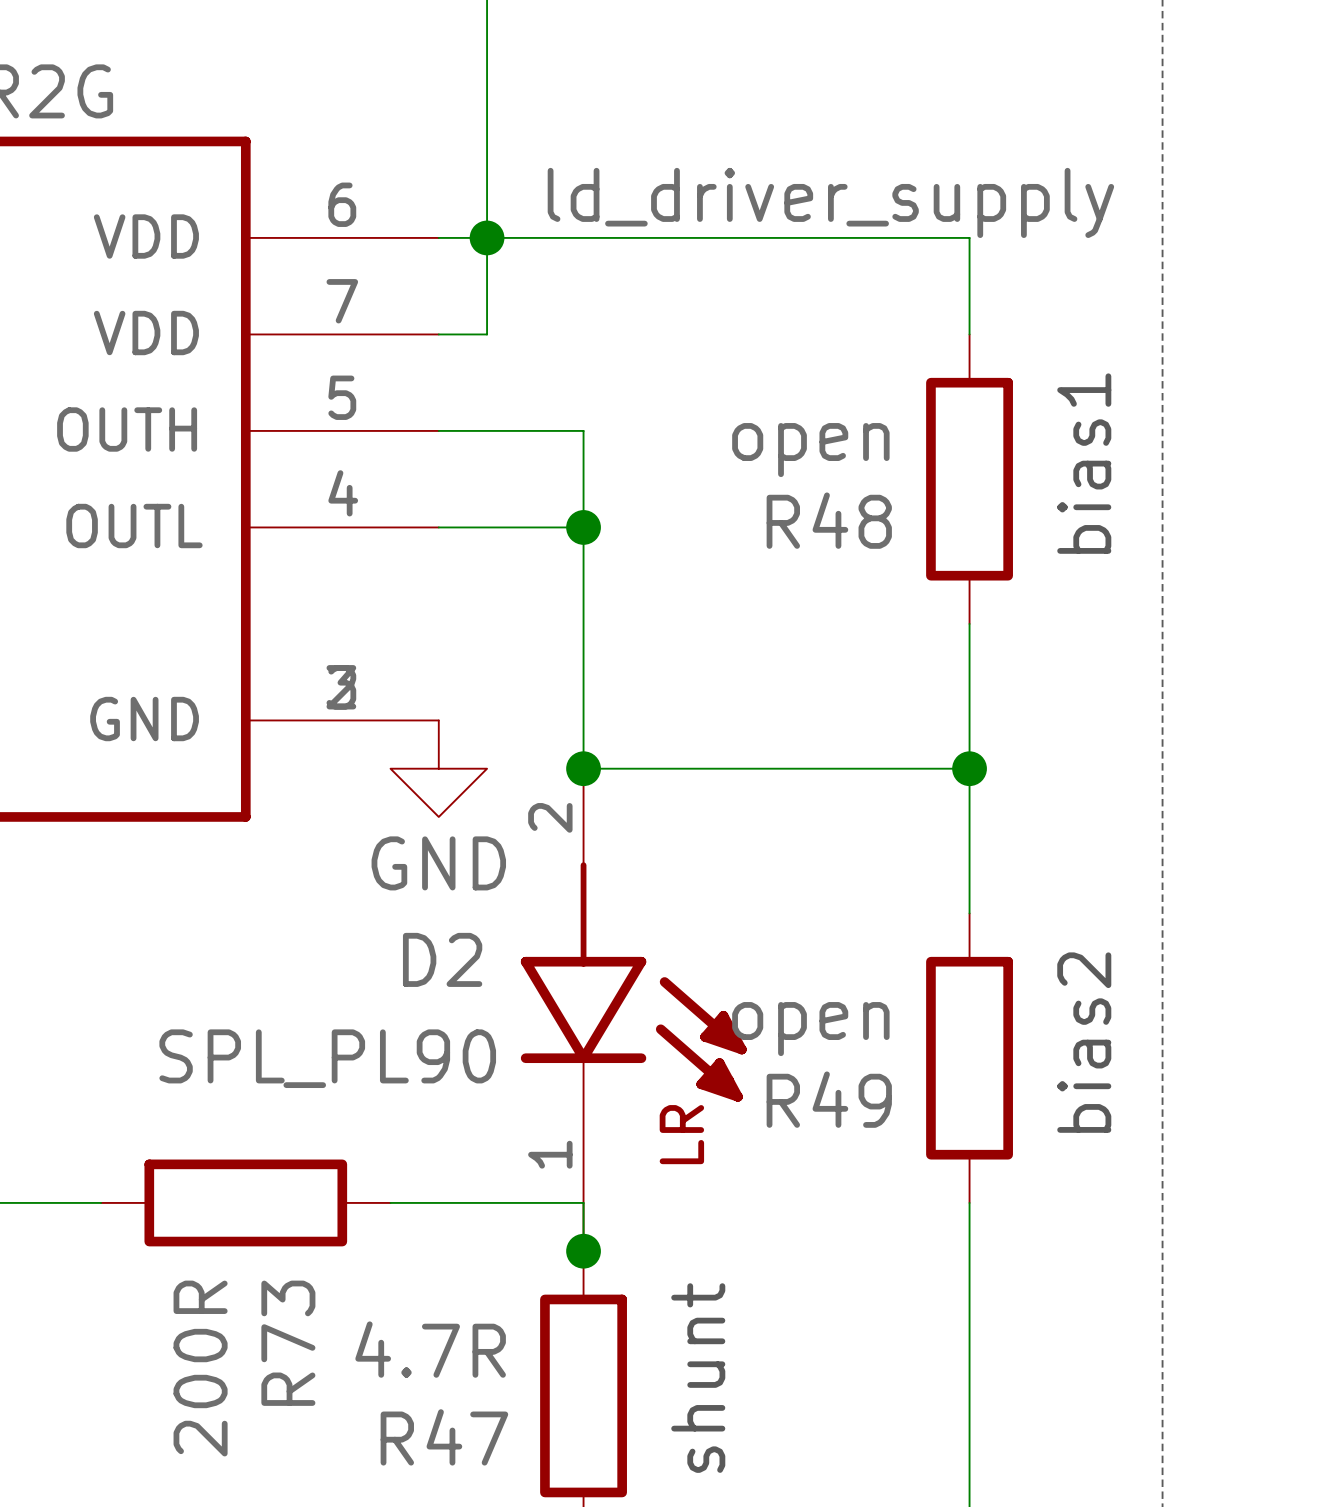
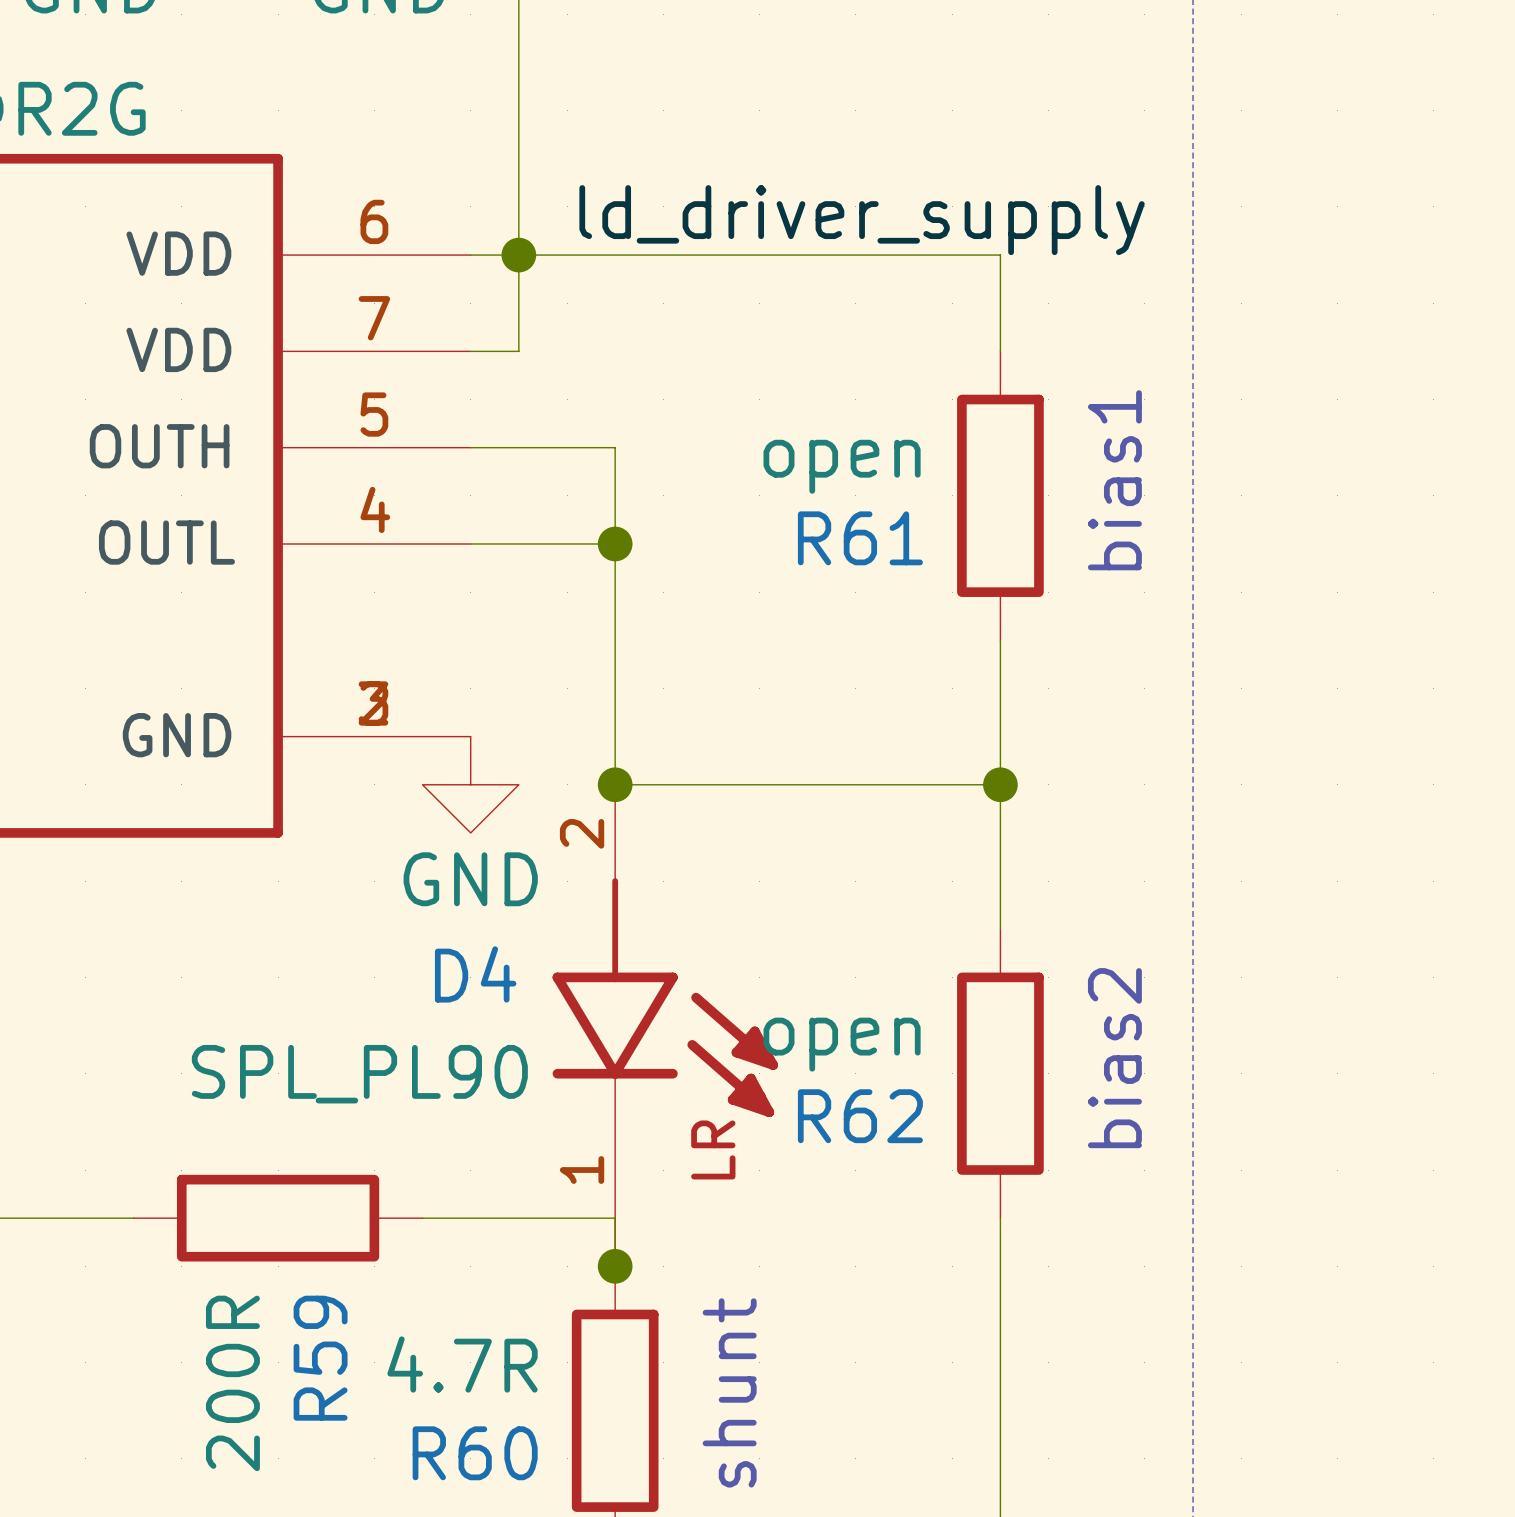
R48 name: R48 (829, 520) -> R61 (860, 538)
D2 name: D2 (442, 959) -> D4 (475, 974)
R49 name: R49 (829, 1099) -> R62 (860, 1116)
R73 name: R73 (288, 1343) -> R59 (320, 1358)
R47 name: R47 (444, 1437) -> R60 (475, 1453)

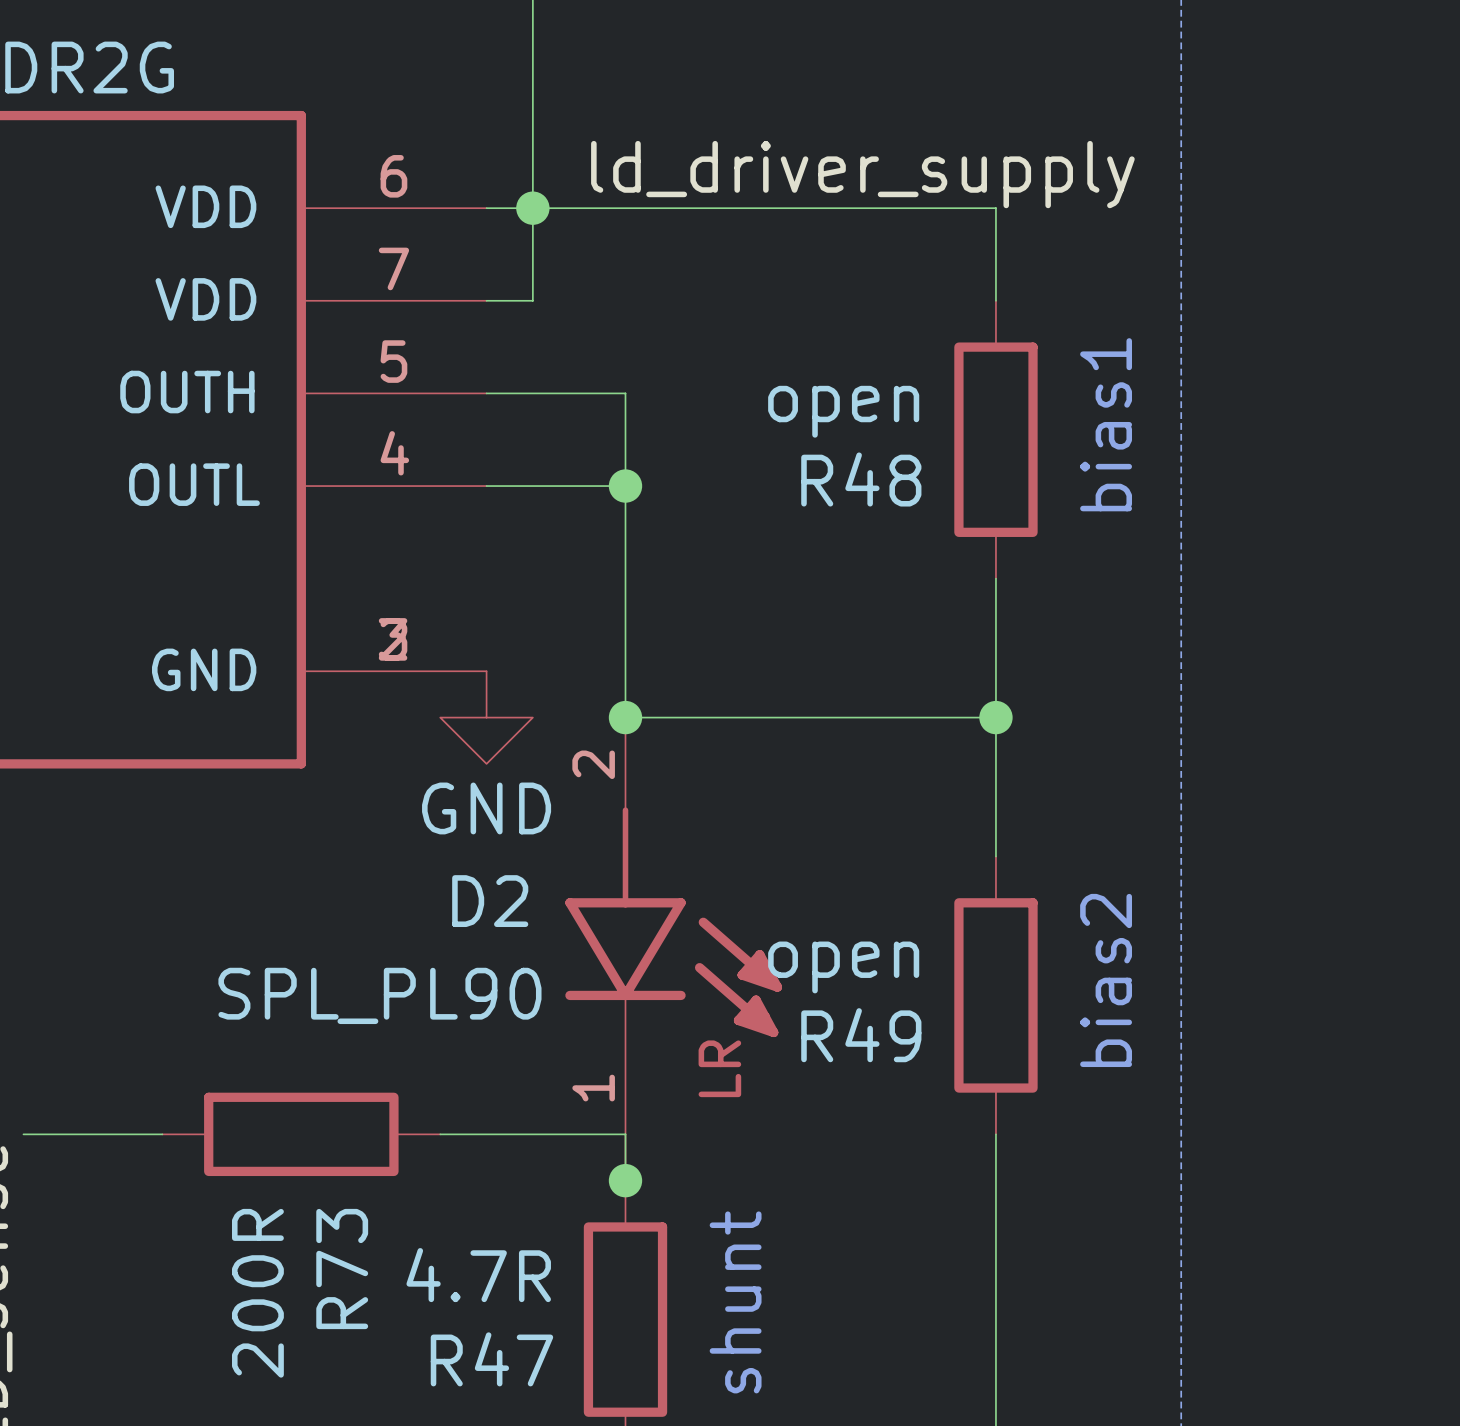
R61 name: R61 (860, 538) -> R48 (861, 479)
D4 name: D4 (475, 974) -> D2 (490, 901)
R62 name: R62 (860, 1116) -> R49 (861, 1035)
R59 name: R59 (320, 1358) -> R73 (342, 1269)
R60 name: R60 (475, 1453) -> R47 (491, 1359)

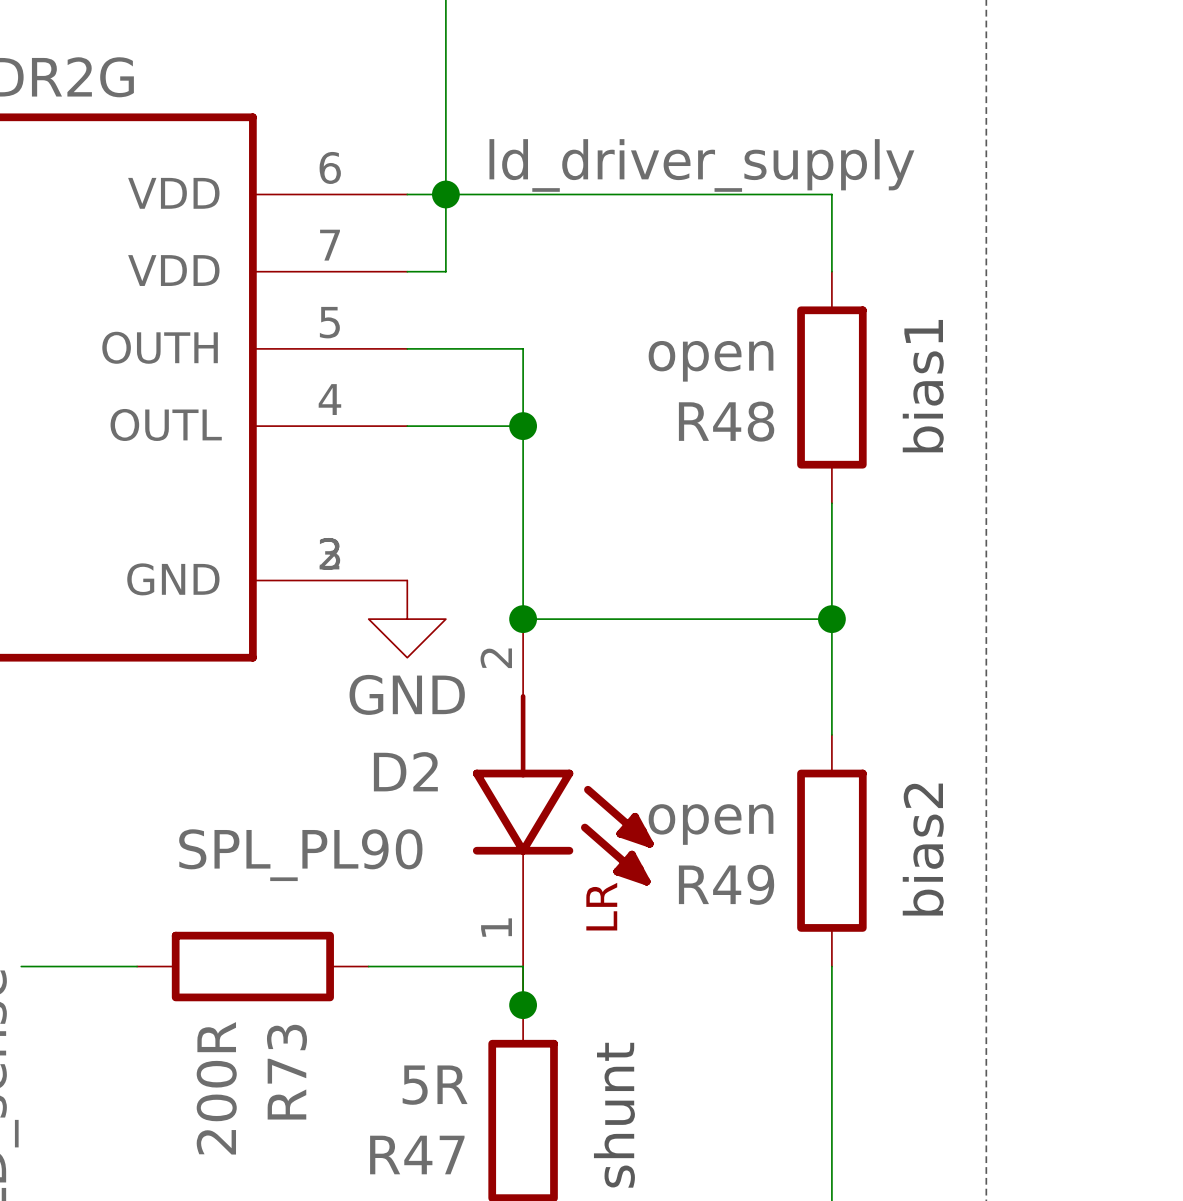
R47 value: 4.7R (478, 1275) -> 5R (435, 1085)

